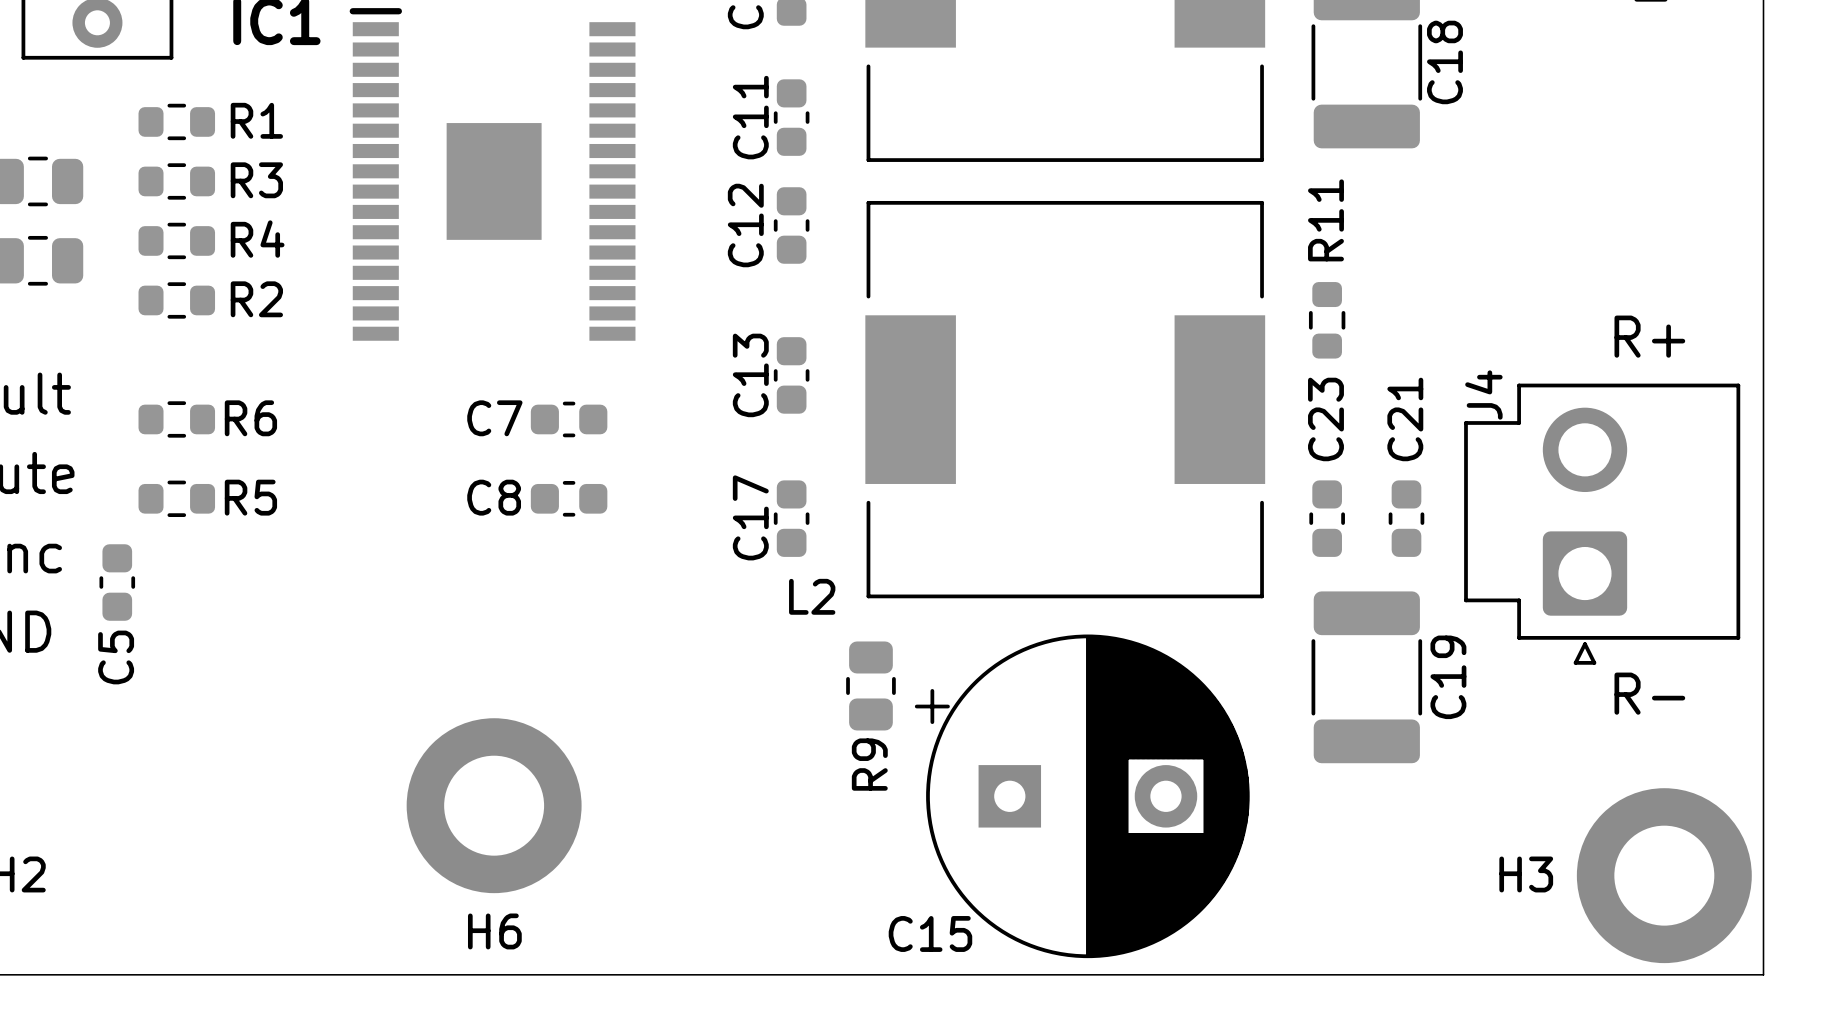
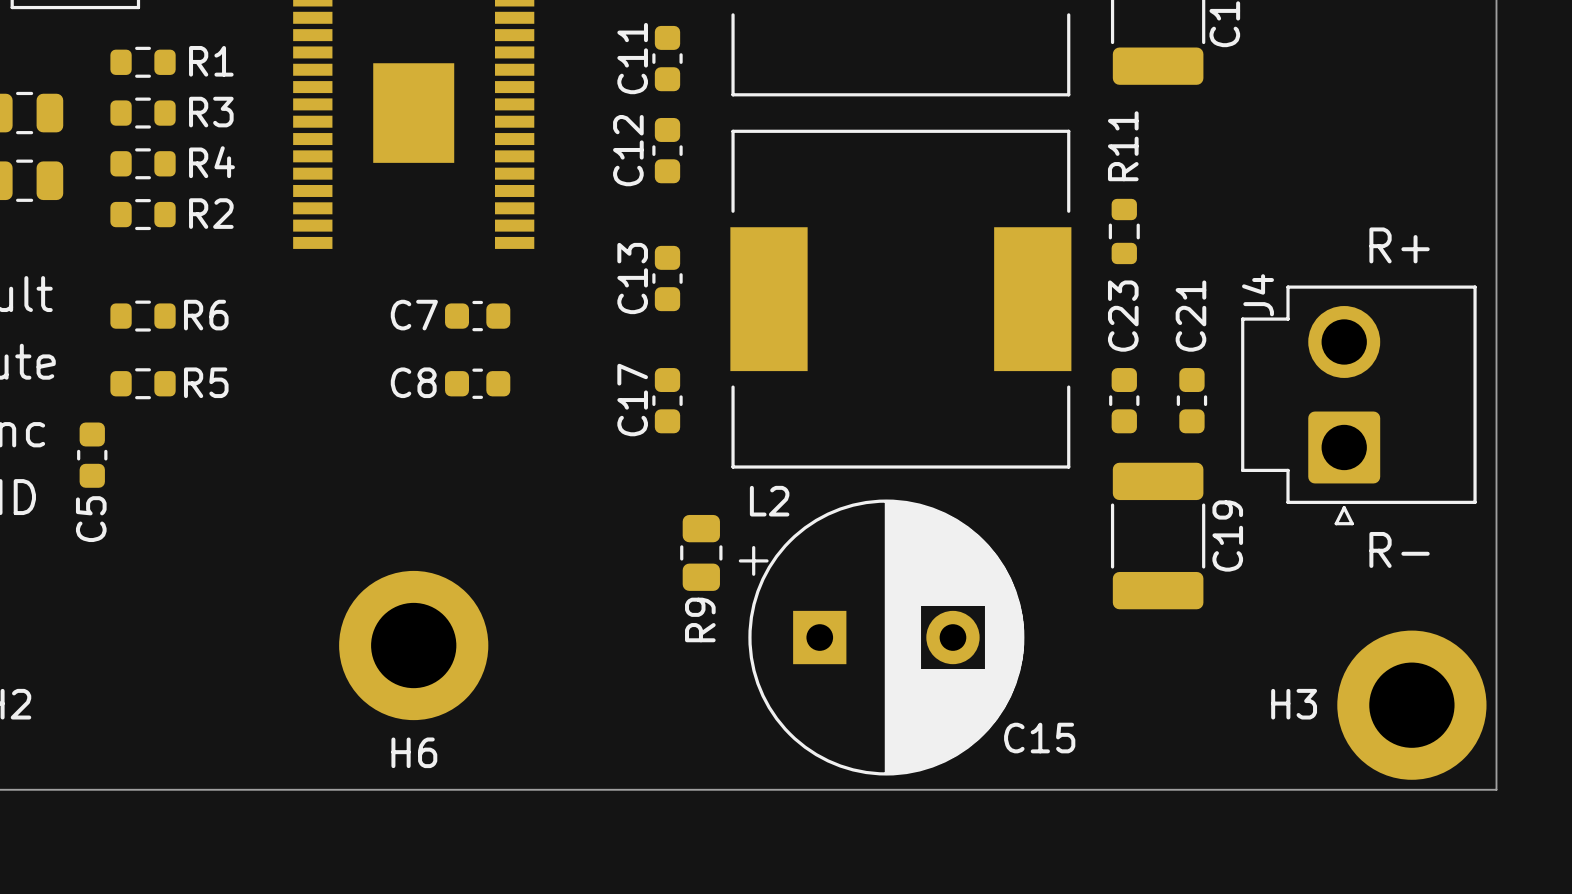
L2 name position: L2 (812, 596) -> L2 (769, 501)
R9 position: (870, 685) -> (701, 552)
C15 position: (1082, 796) -> (881, 637)
C15 name position: C15 (930, 933) -> C15 (1039, 738)

